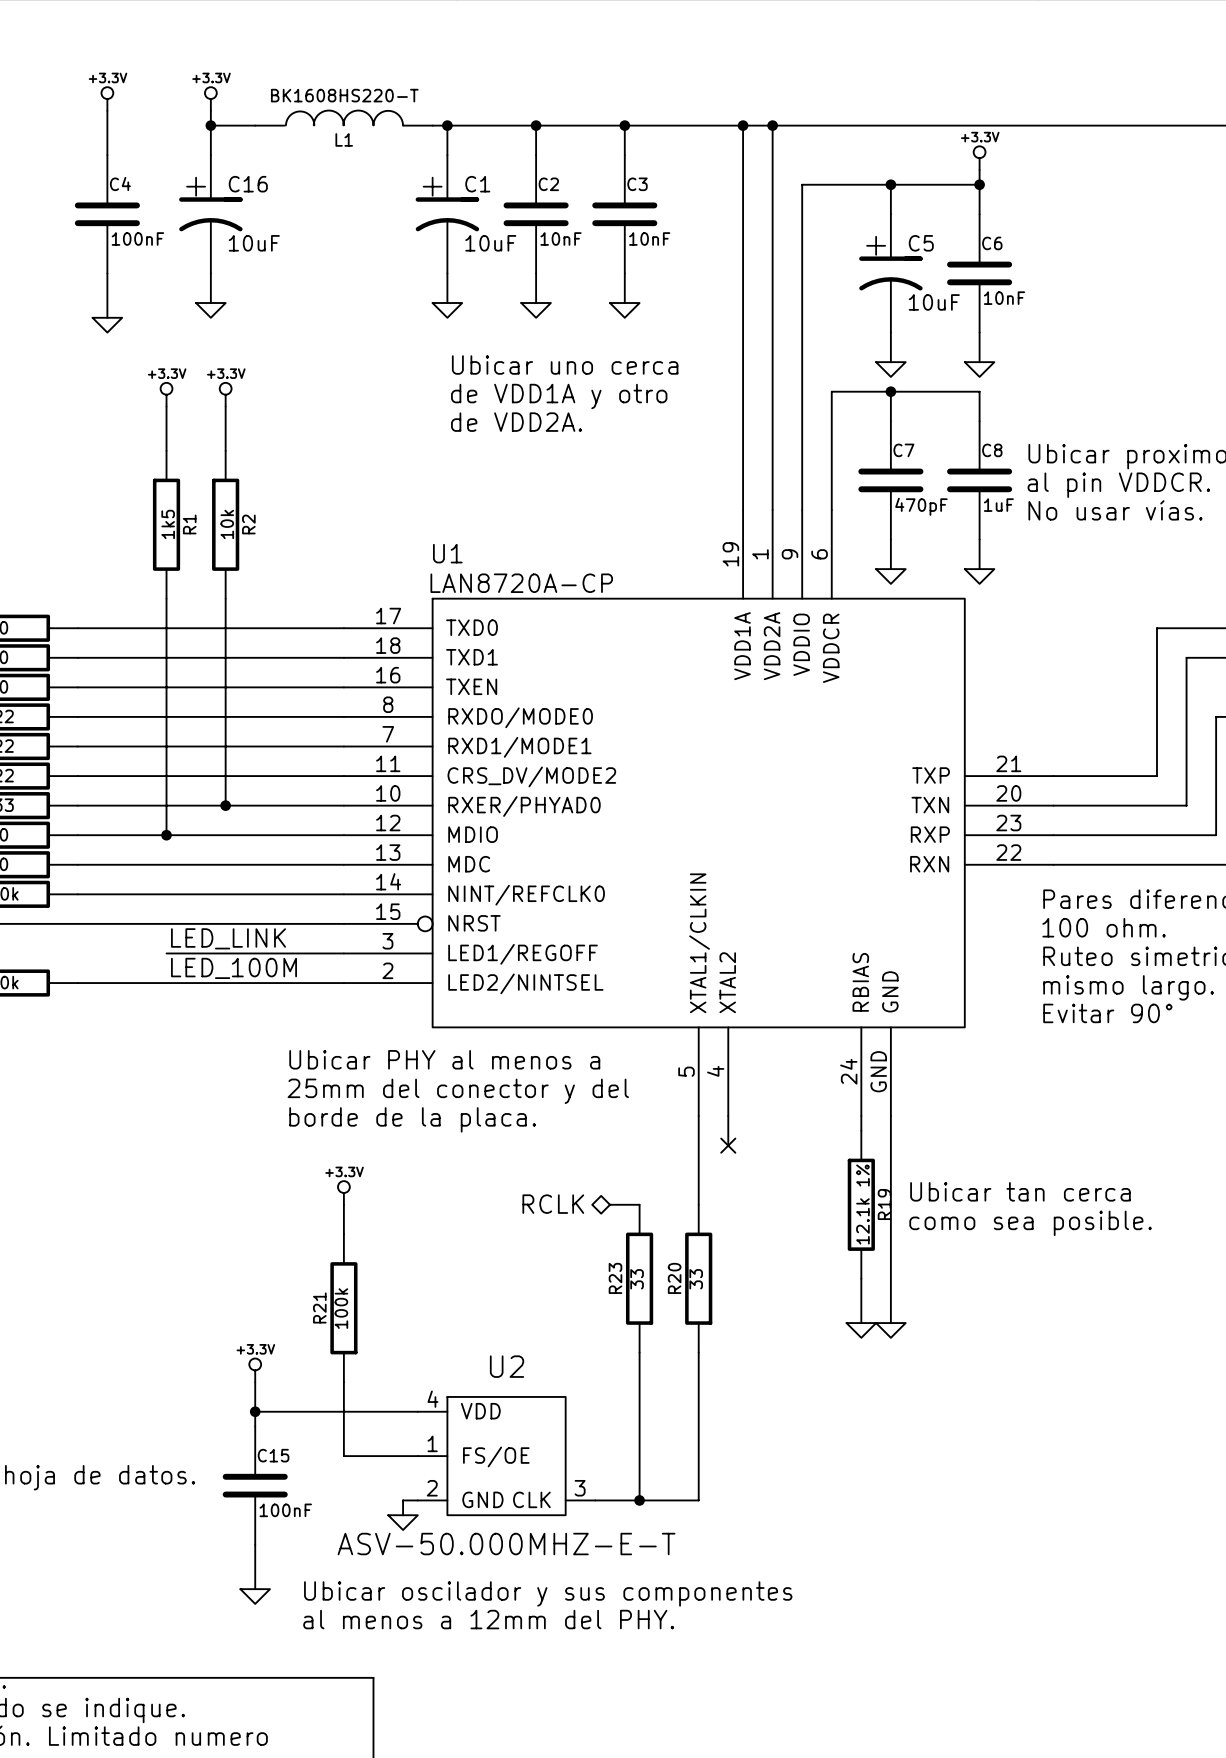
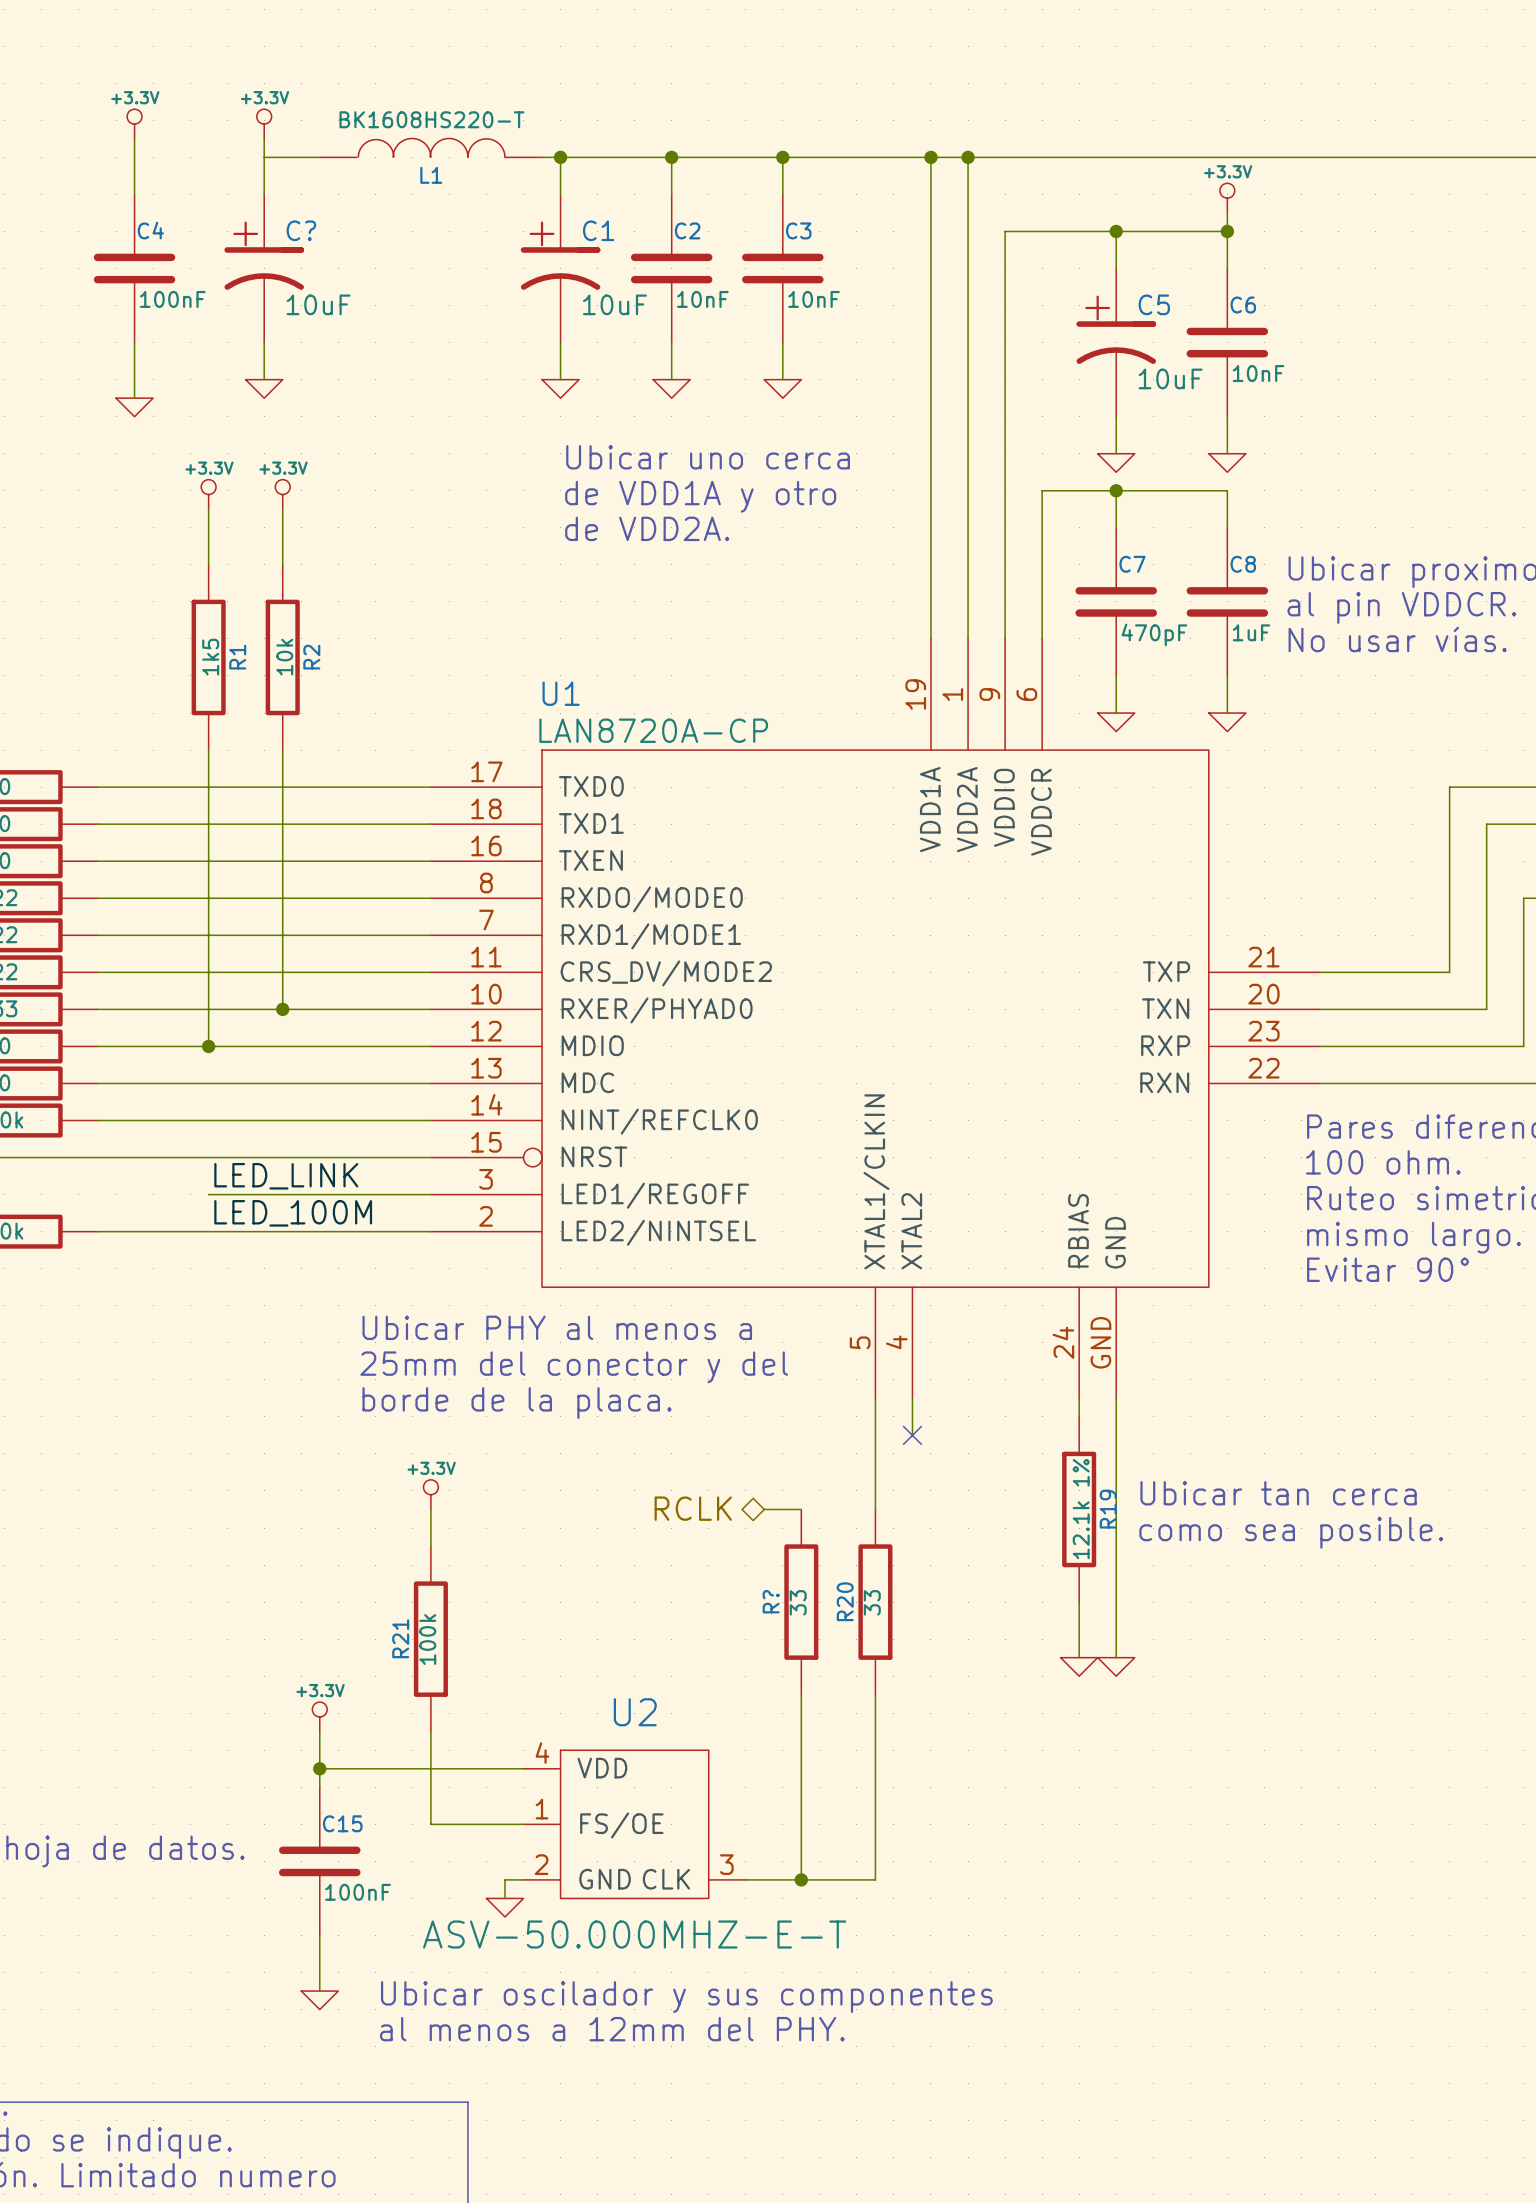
junction: (210, 125) -> none
C16 name: C16 (248, 184) -> C? (301, 230)
R23 name: R23 (615, 1278) -> R? (771, 1601)

